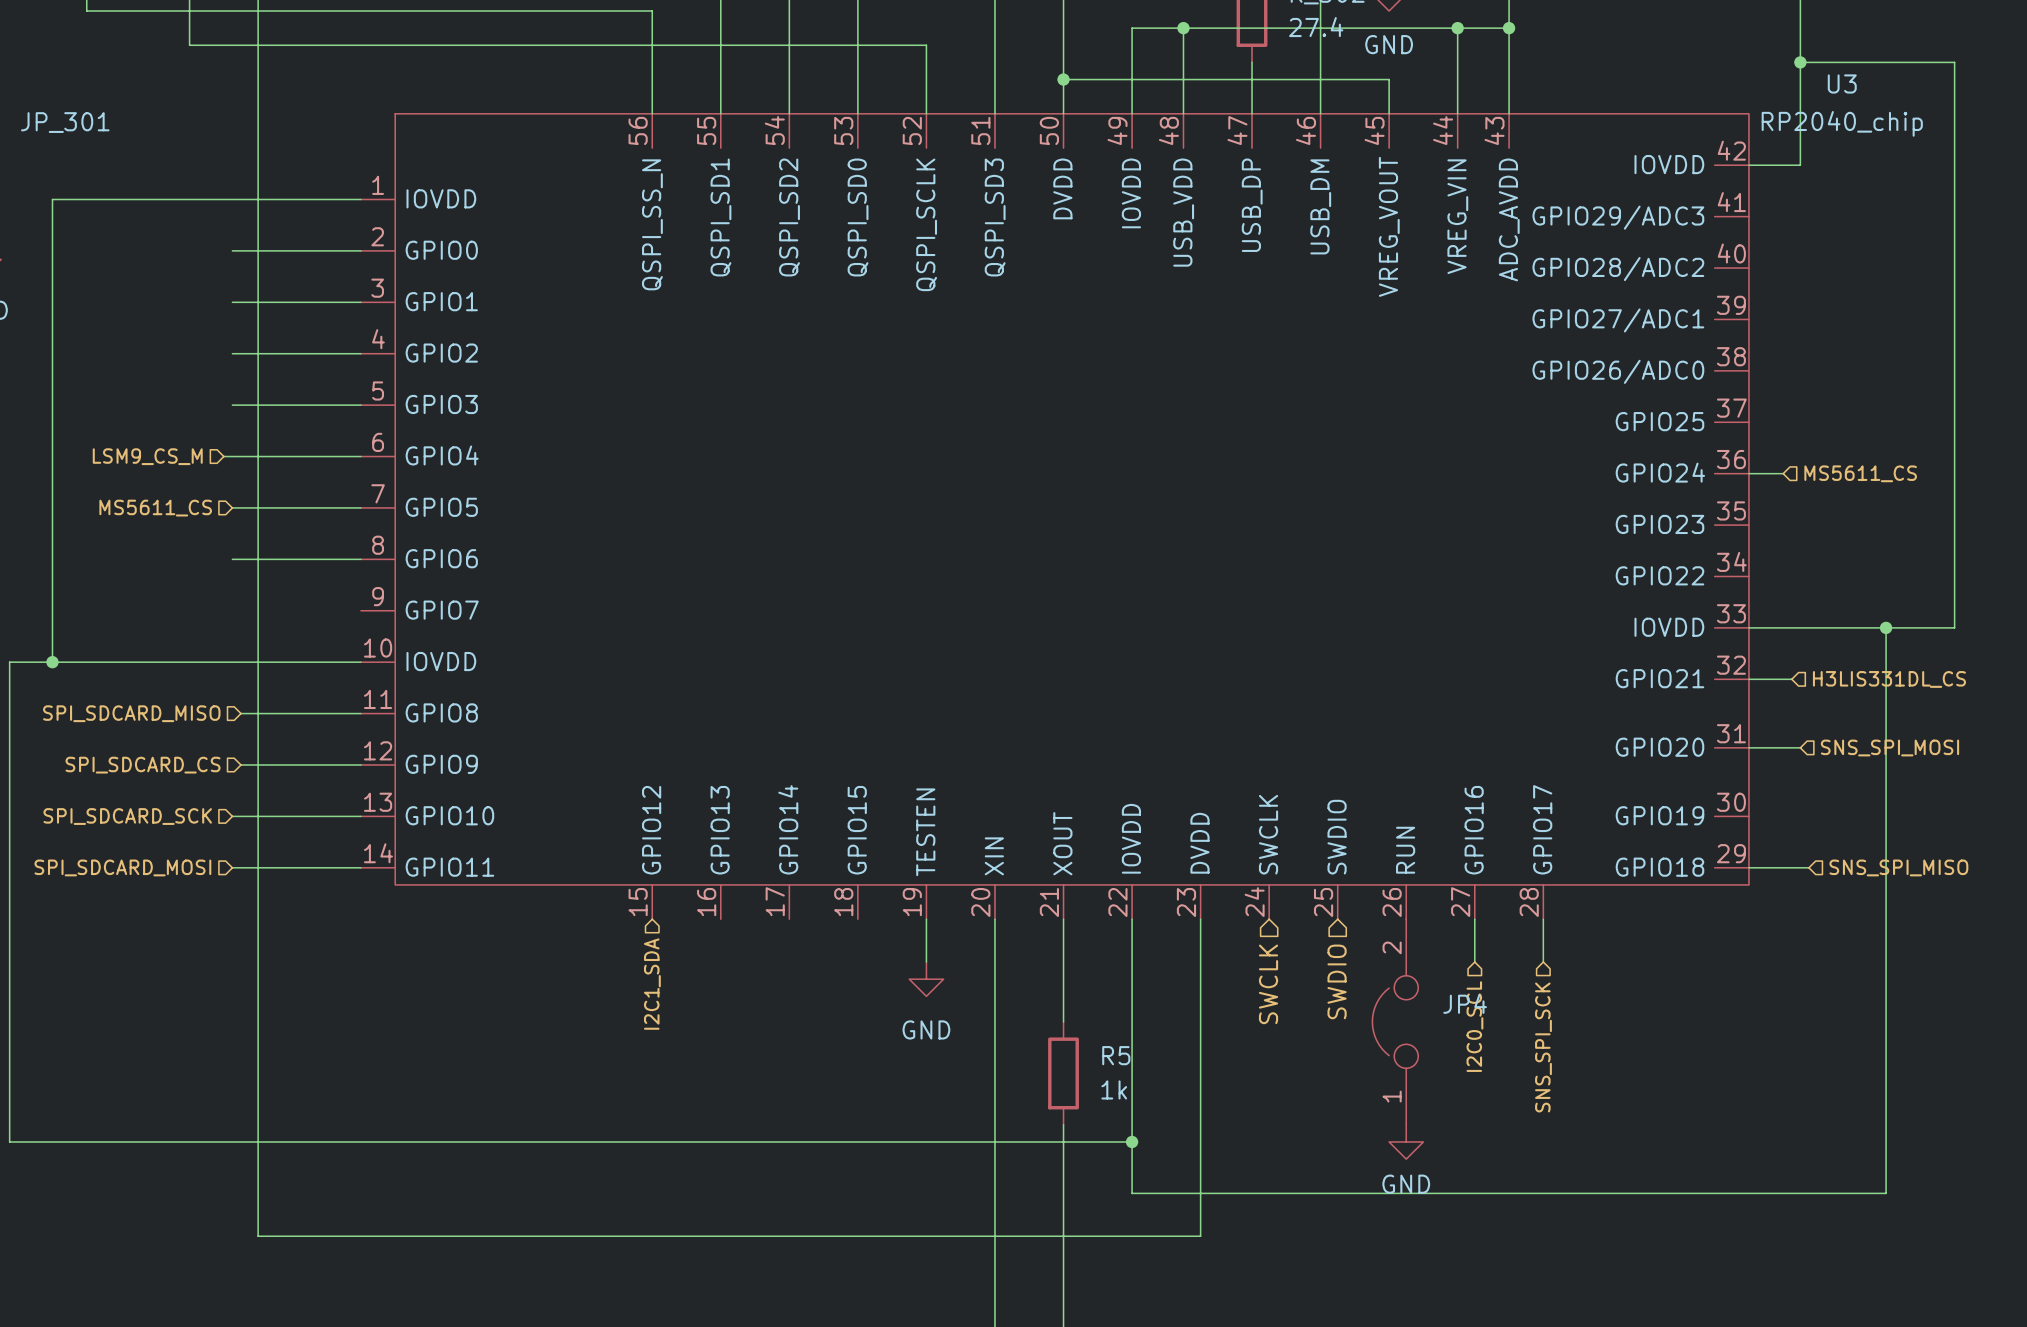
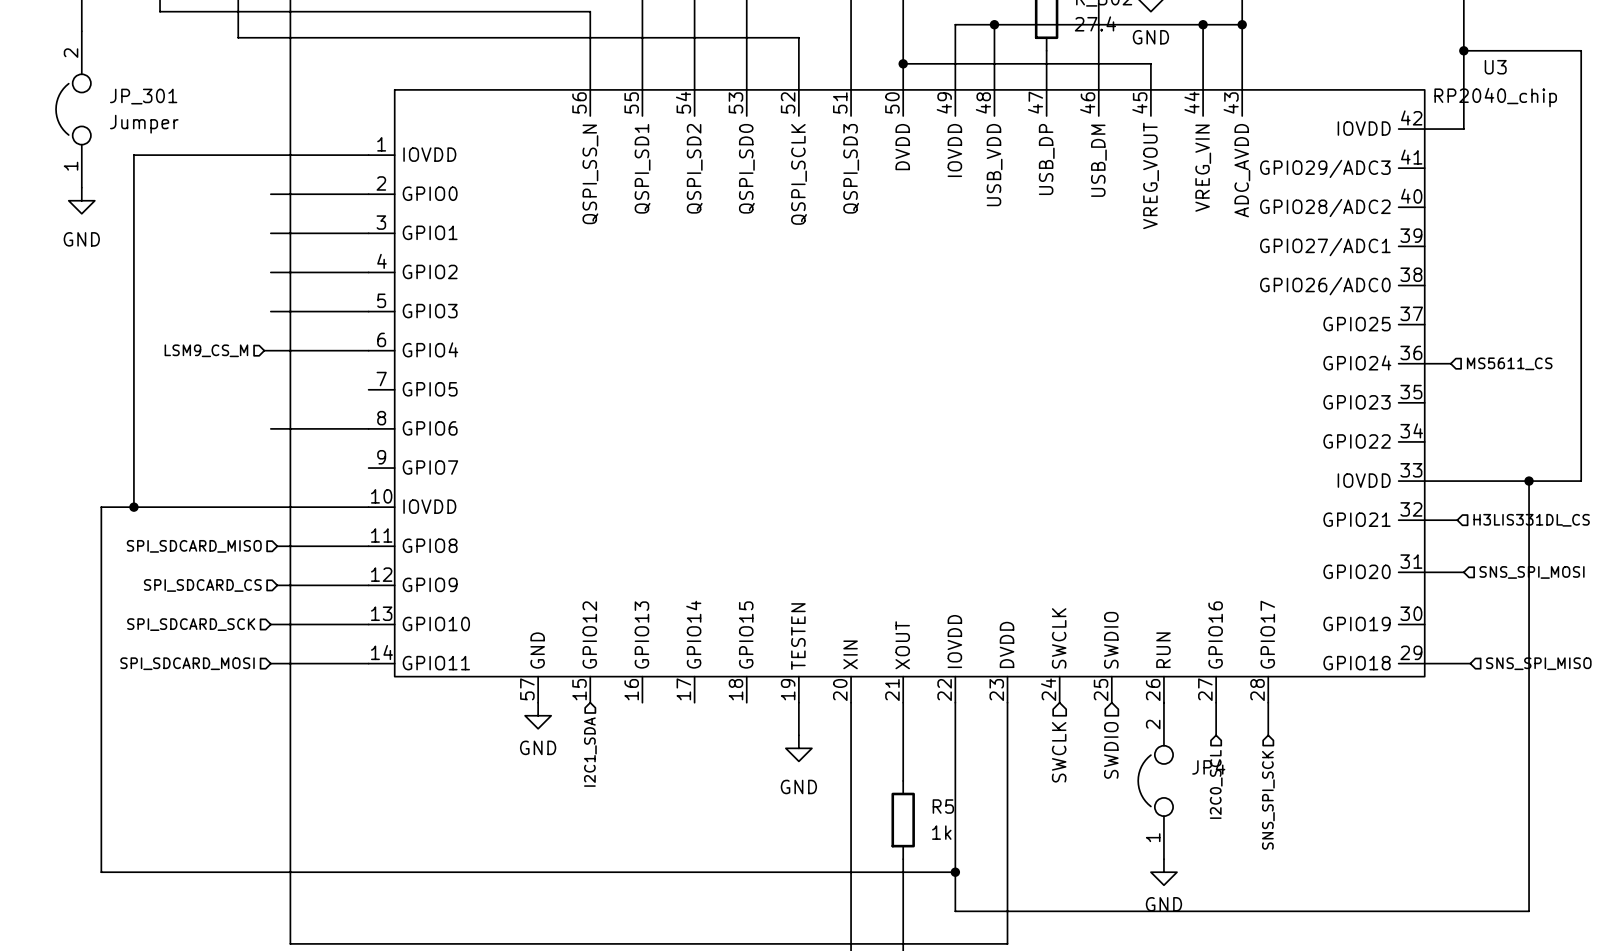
U3 symbol: [360, 113, 1749, 920] -> [368, 89, 1425, 703]
JP_301 value: none -> Jumper (144, 124)
wire: (232, 507) (360, 507) -> none
hierarchical label: MS5611_CS (155, 508) -> none
power symbol: none -> GND (538, 715)

